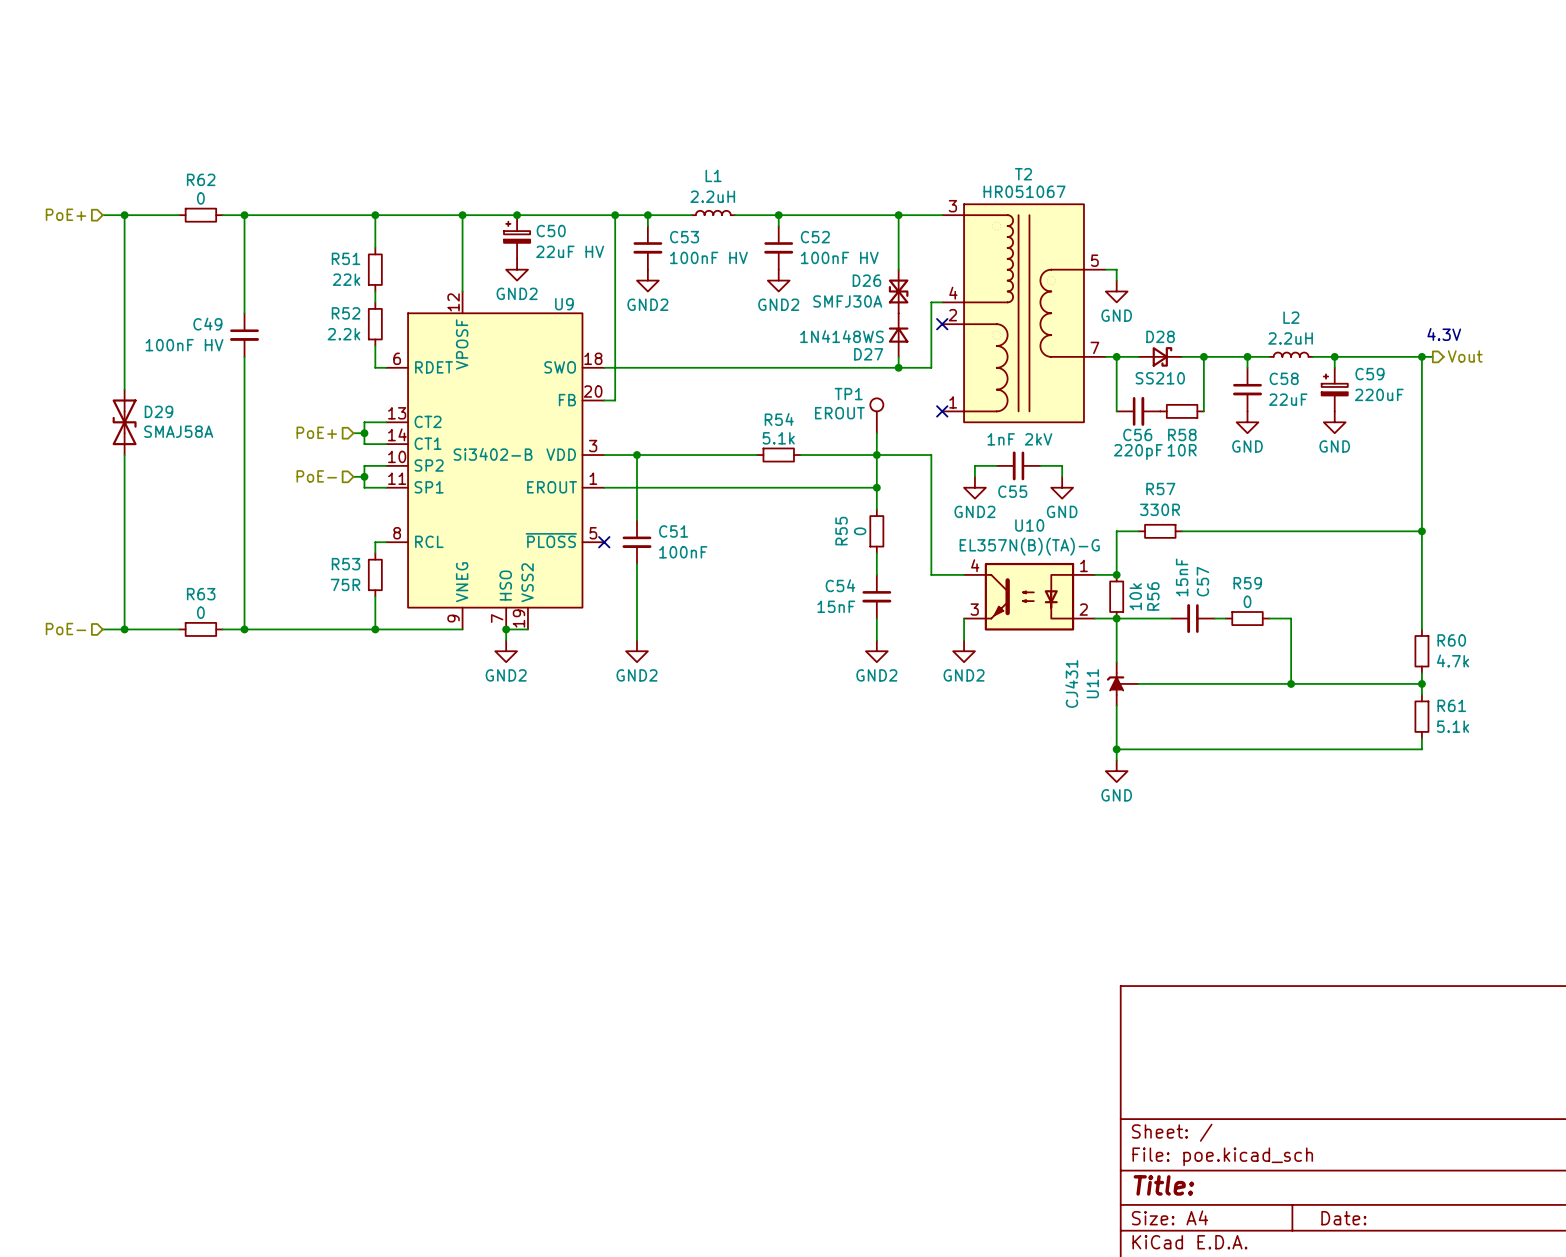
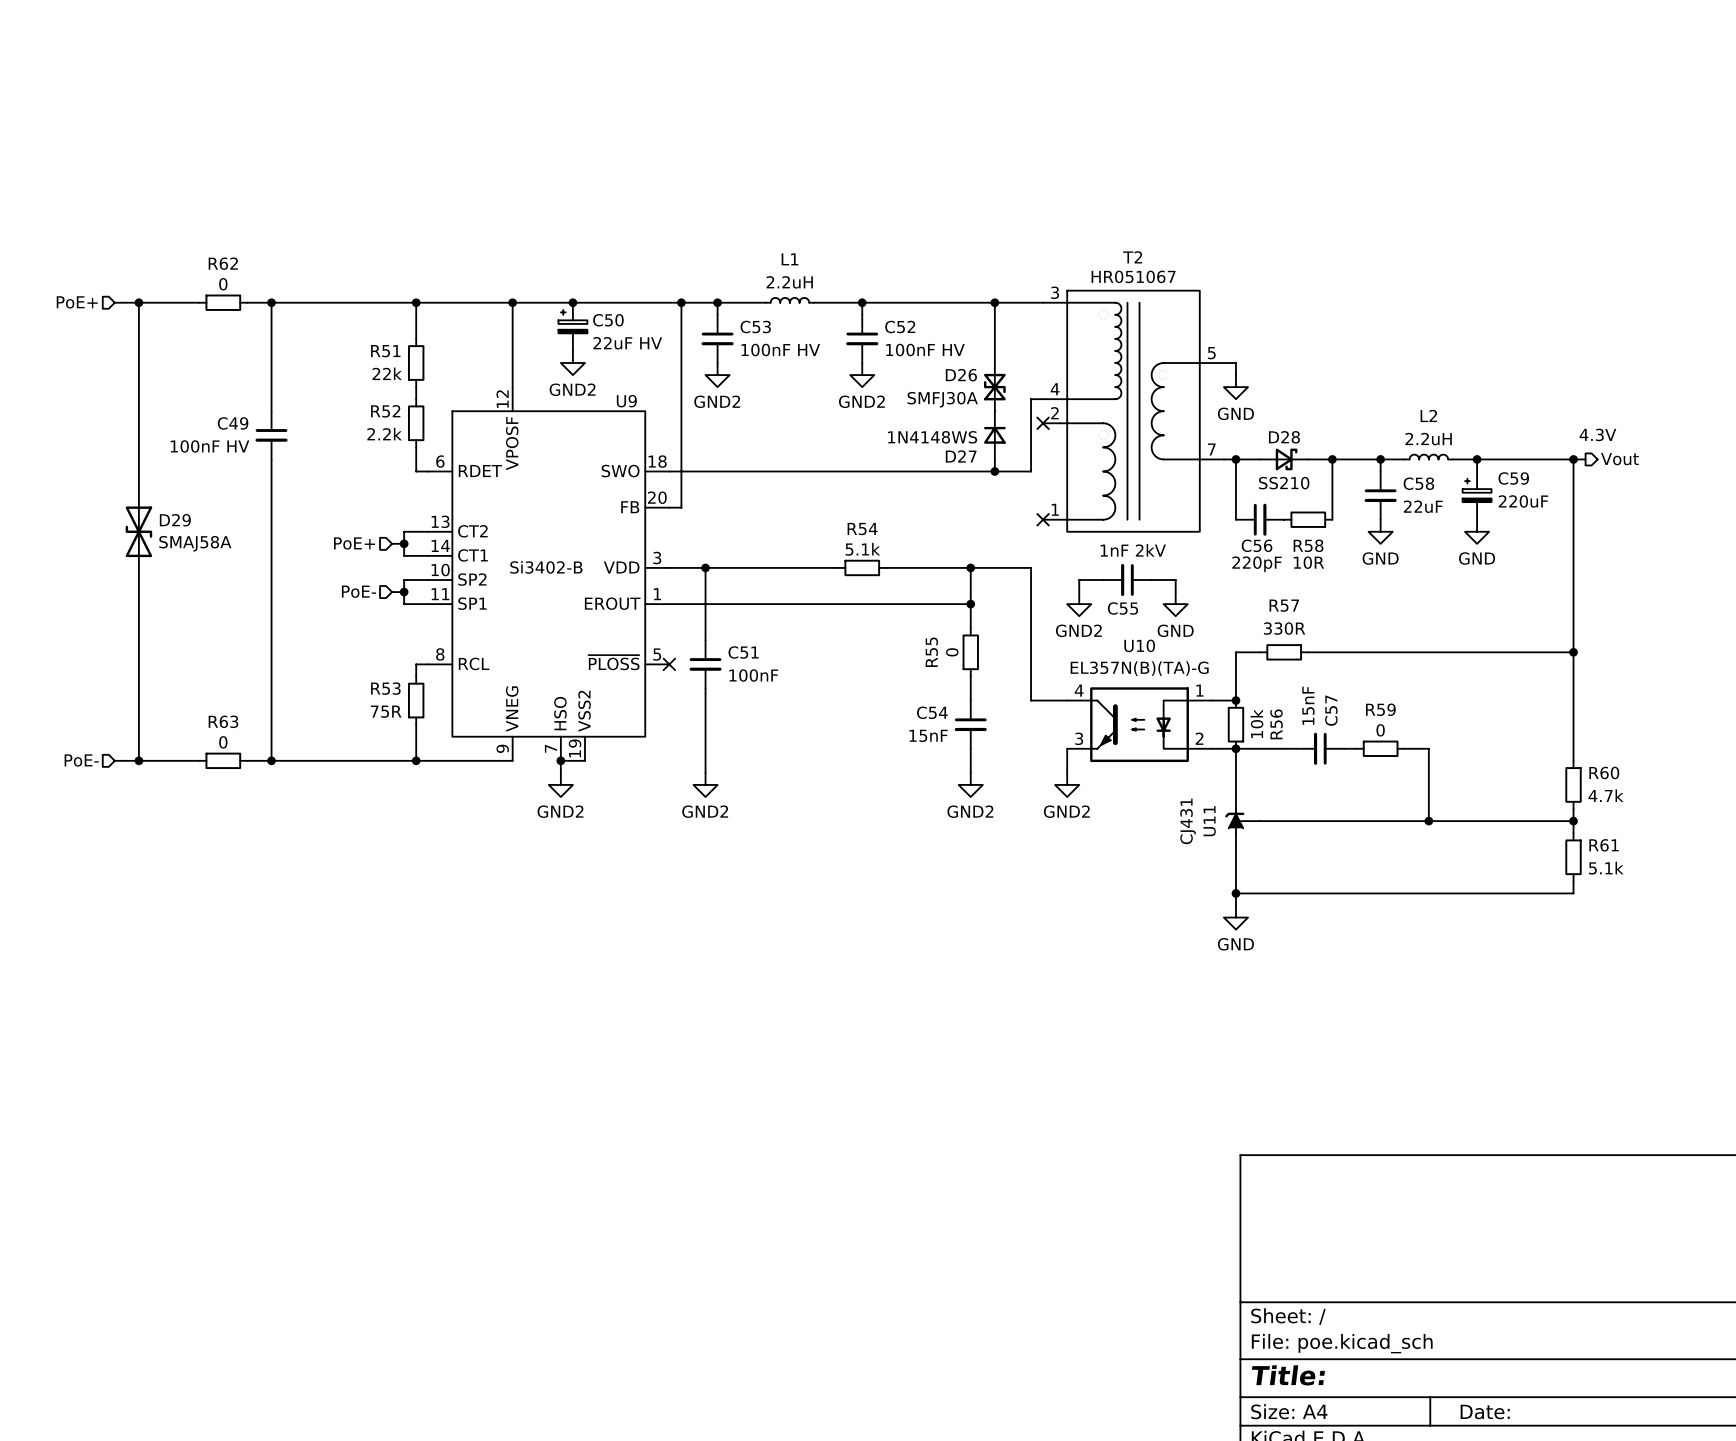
TP1: EROUT (876, 415) -> none
wire: (876, 433) (876, 455) -> none

